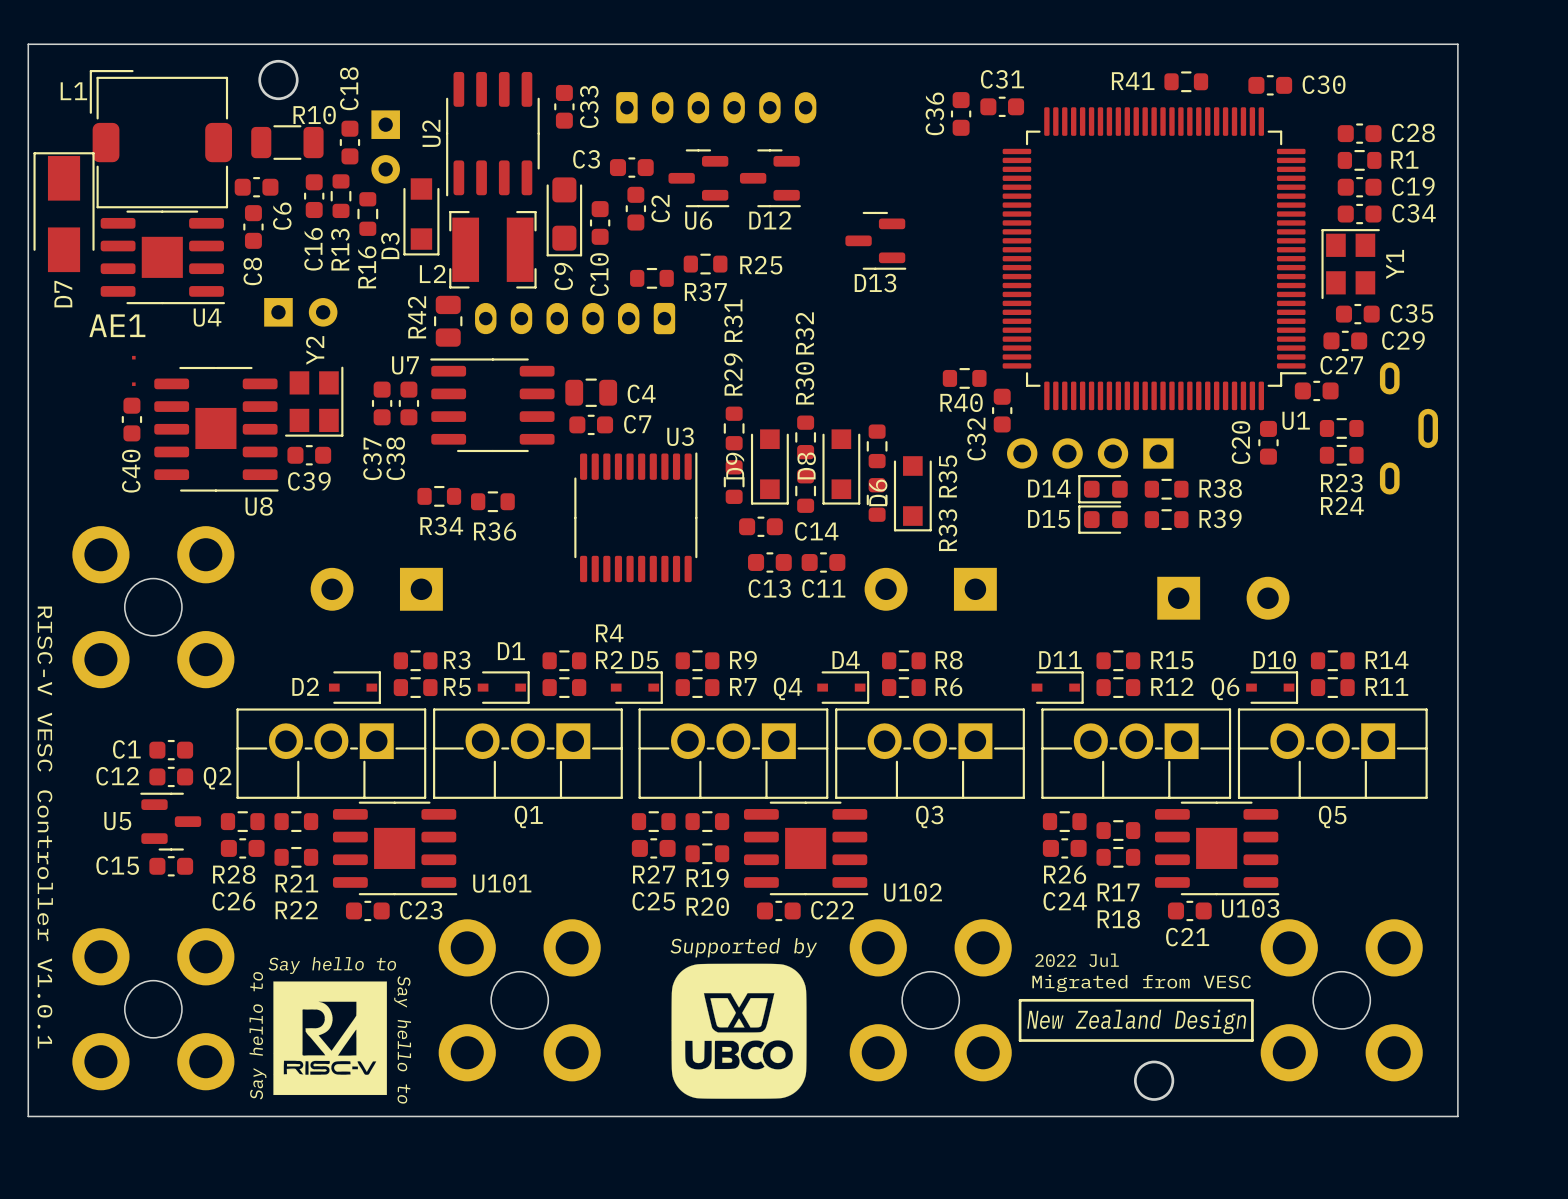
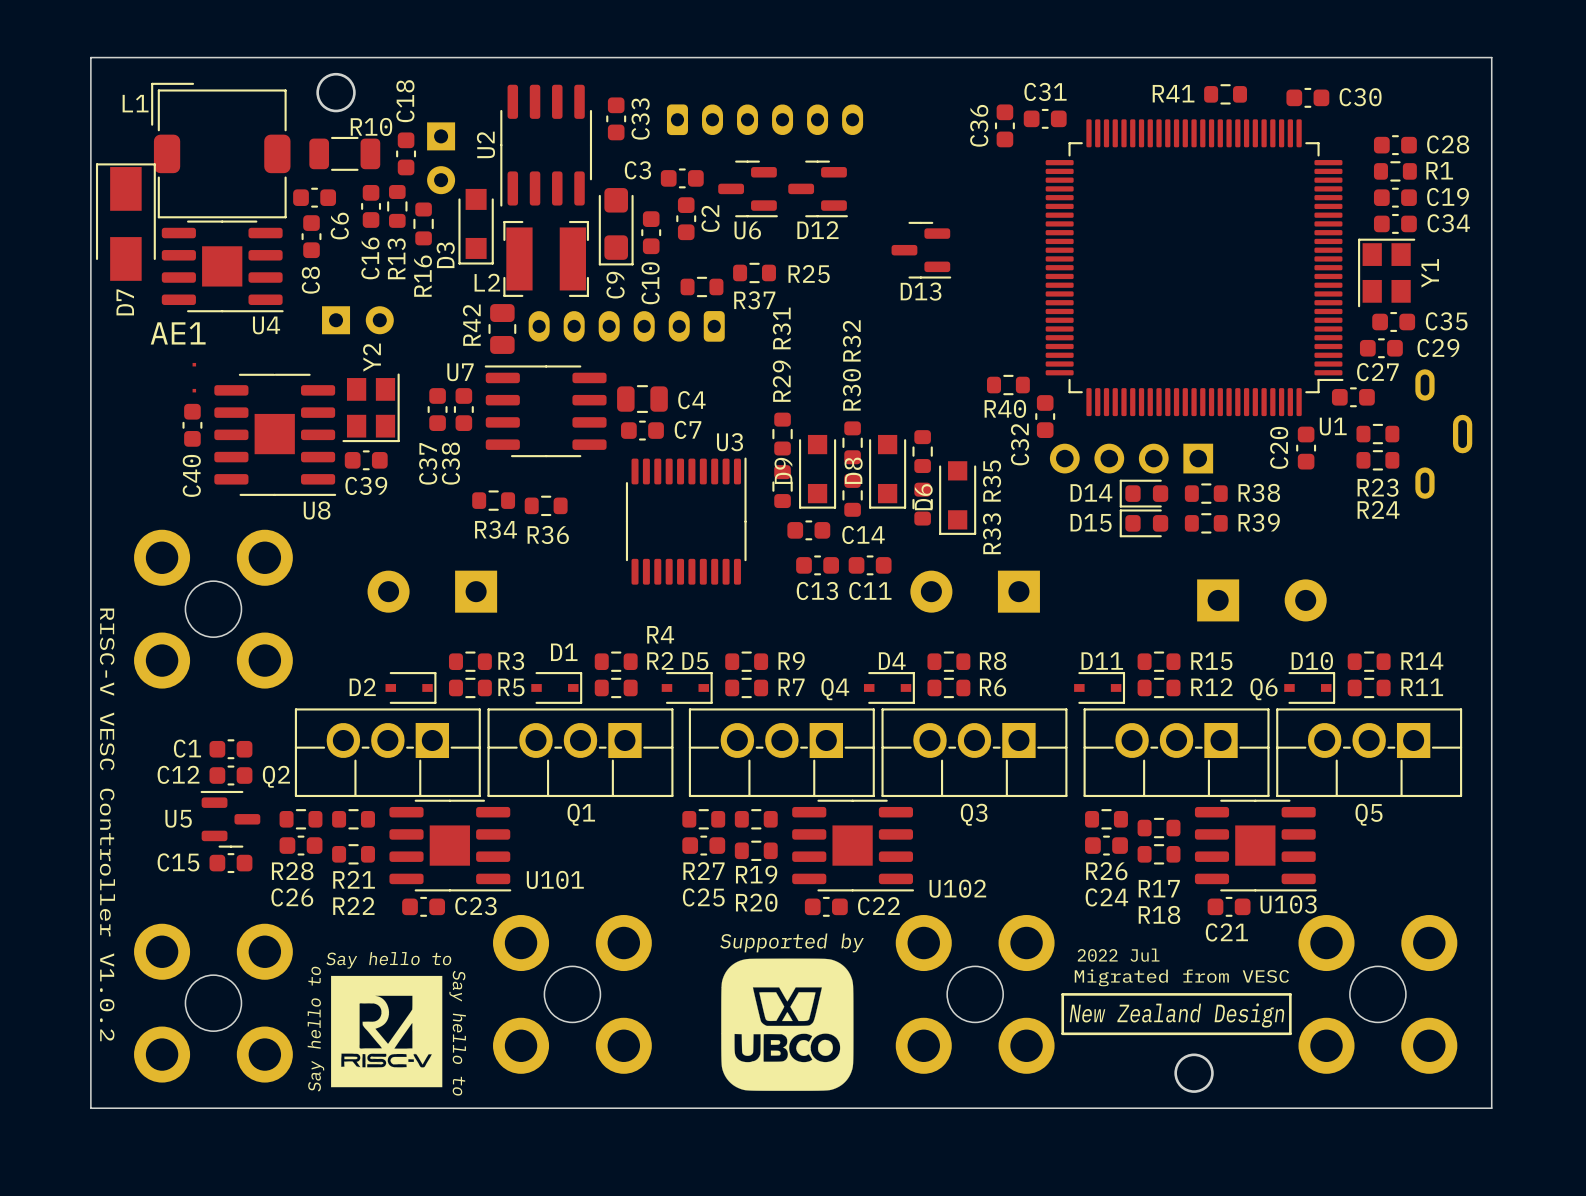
text: RISC-V VESC Controller V1.0.1 (45, 827) -> RISC-V VESC Controller V1.0.2 (107, 824)

